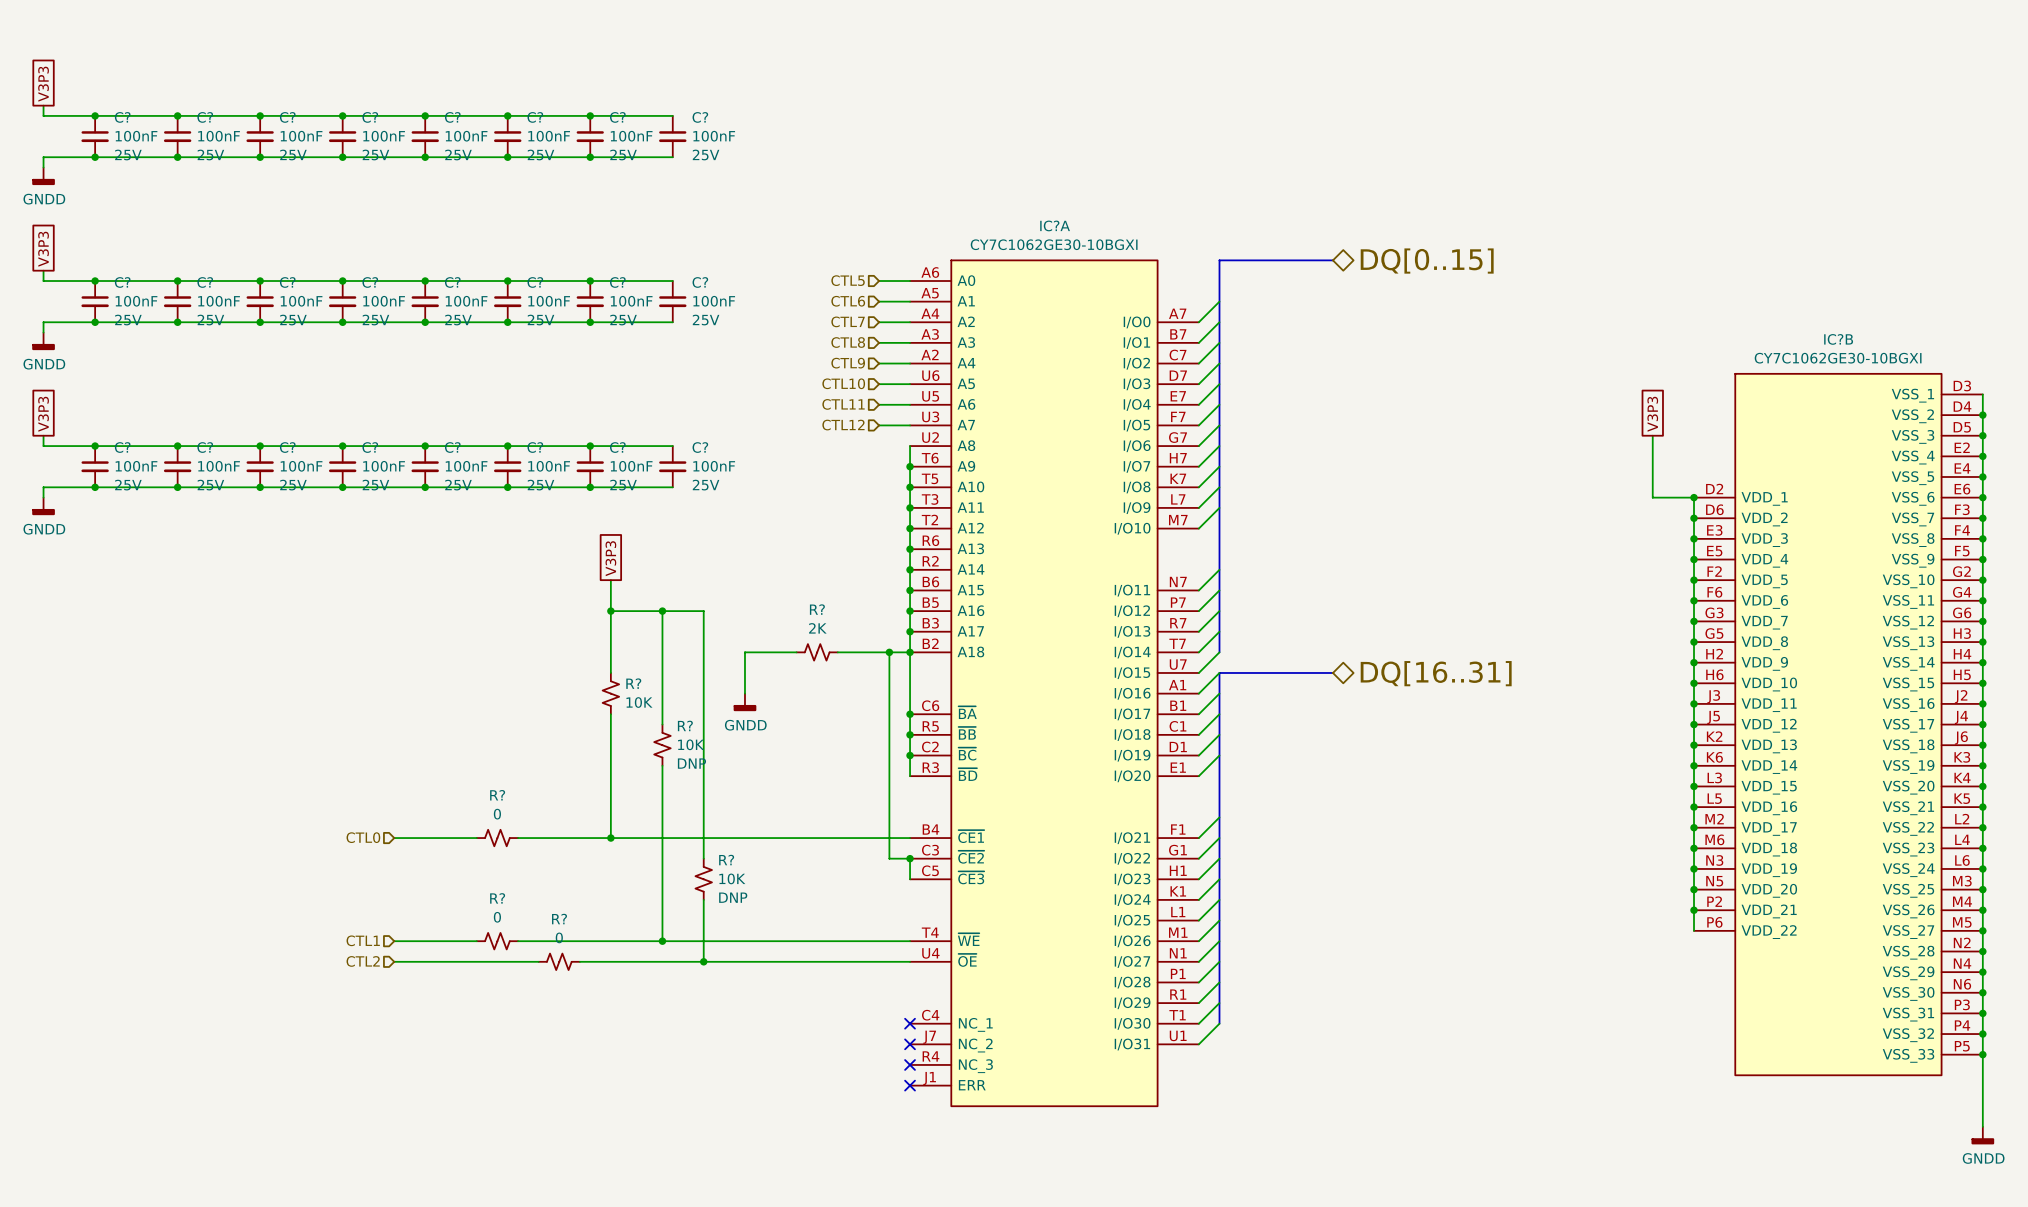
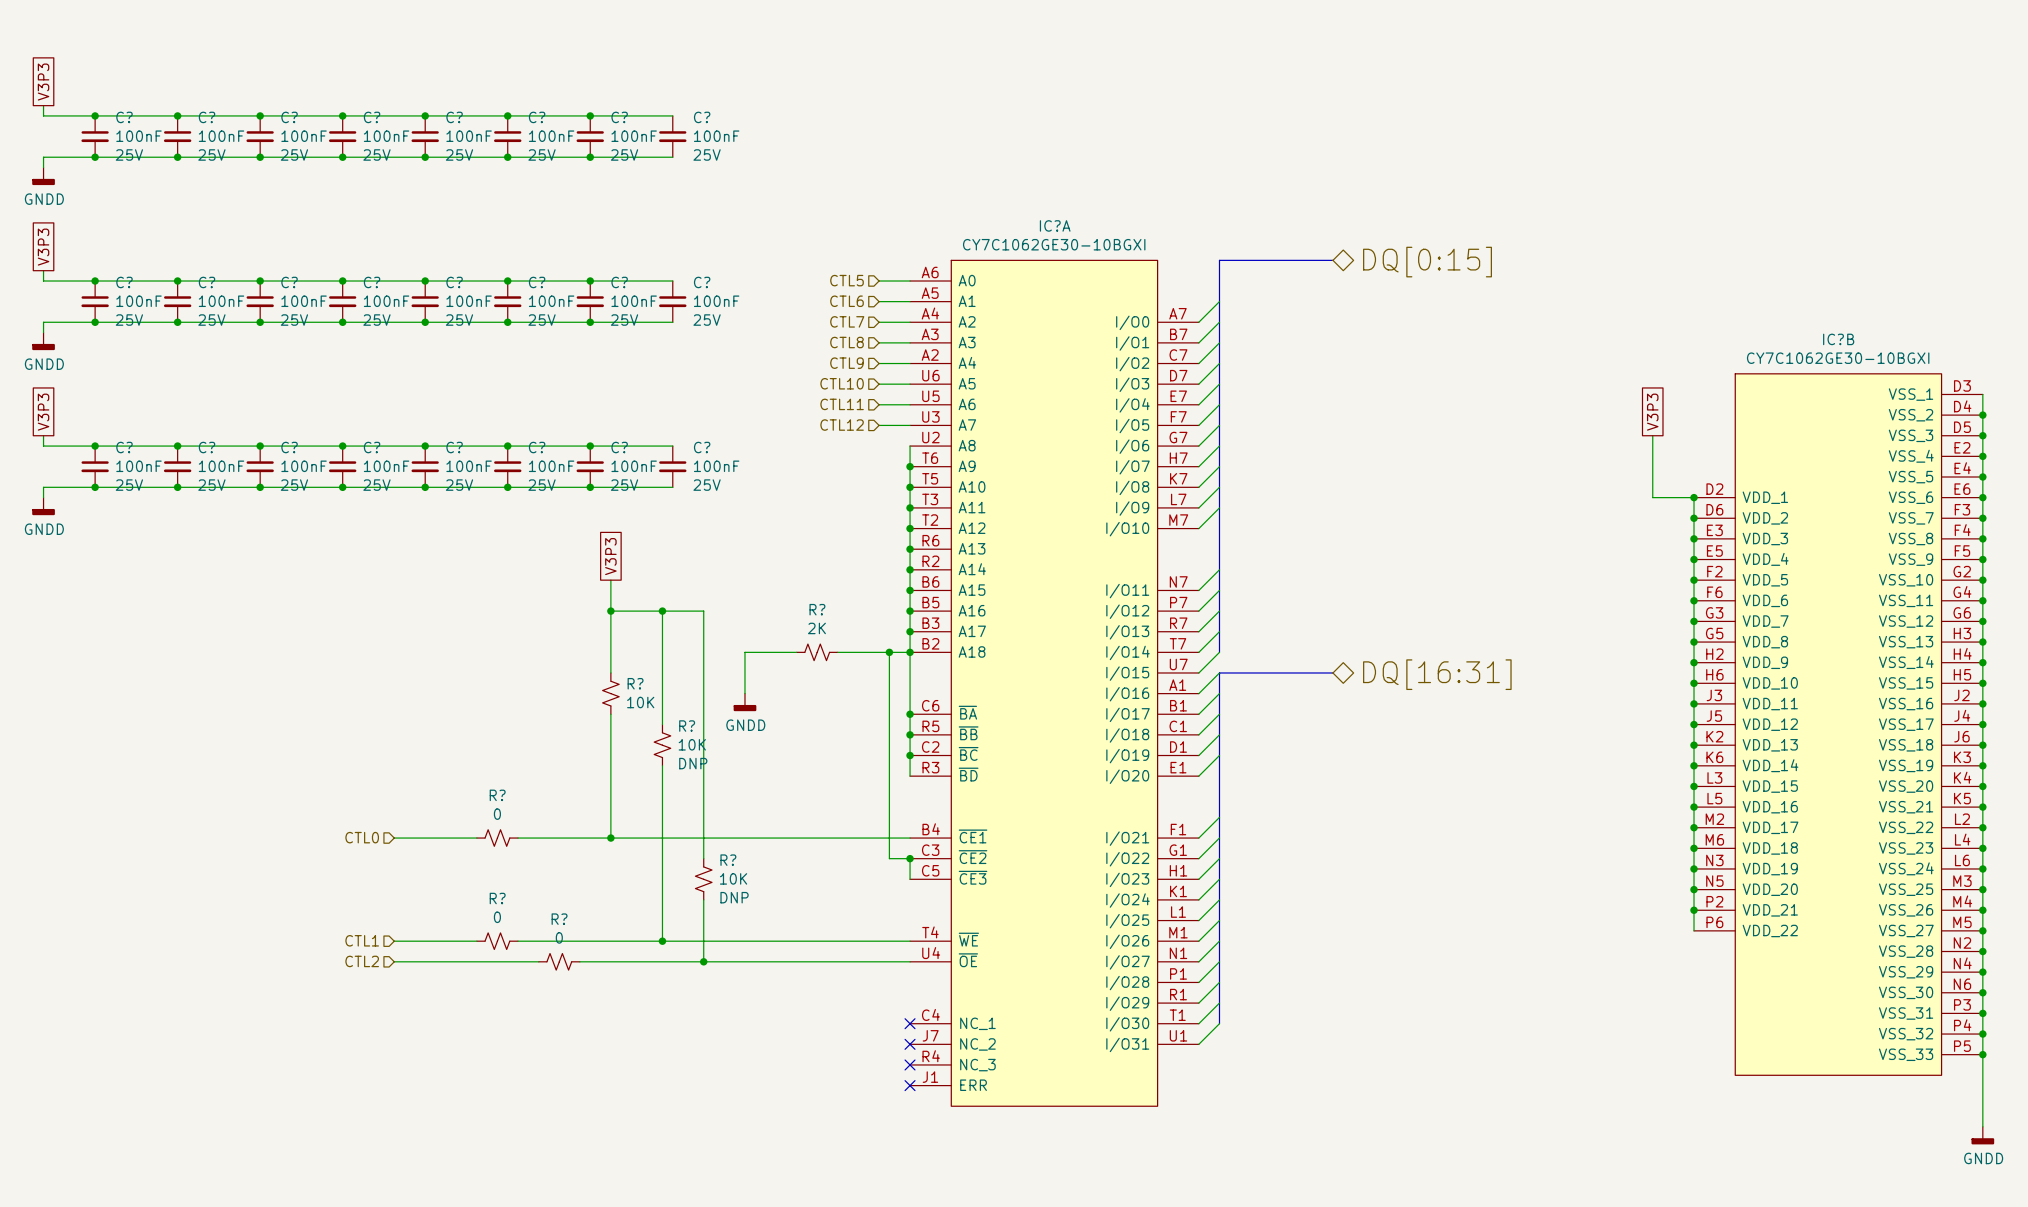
hierarchical label: DQ[0..15] (1427, 261) -> DQ[0:15] (1427, 262)
hierarchical label: DQ[16..31] (1436, 673) -> DQ[16:31] (1437, 674)

